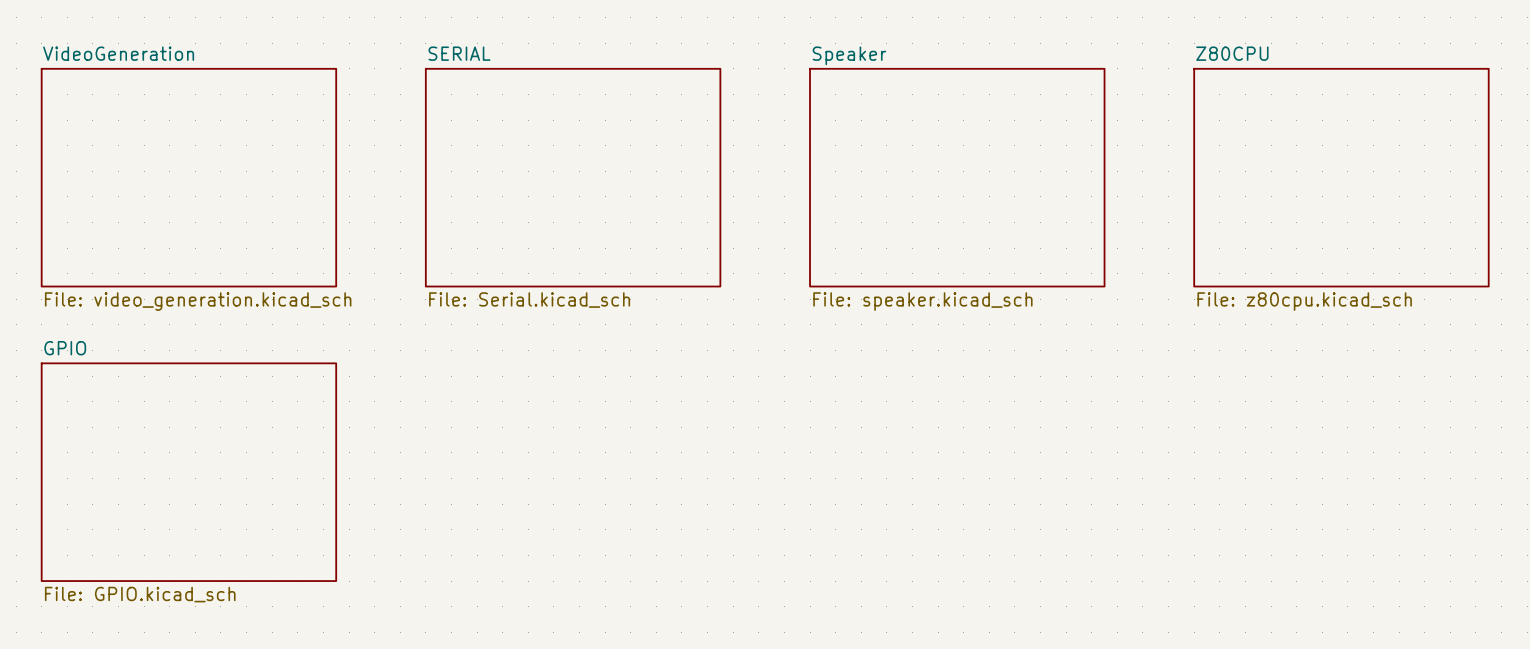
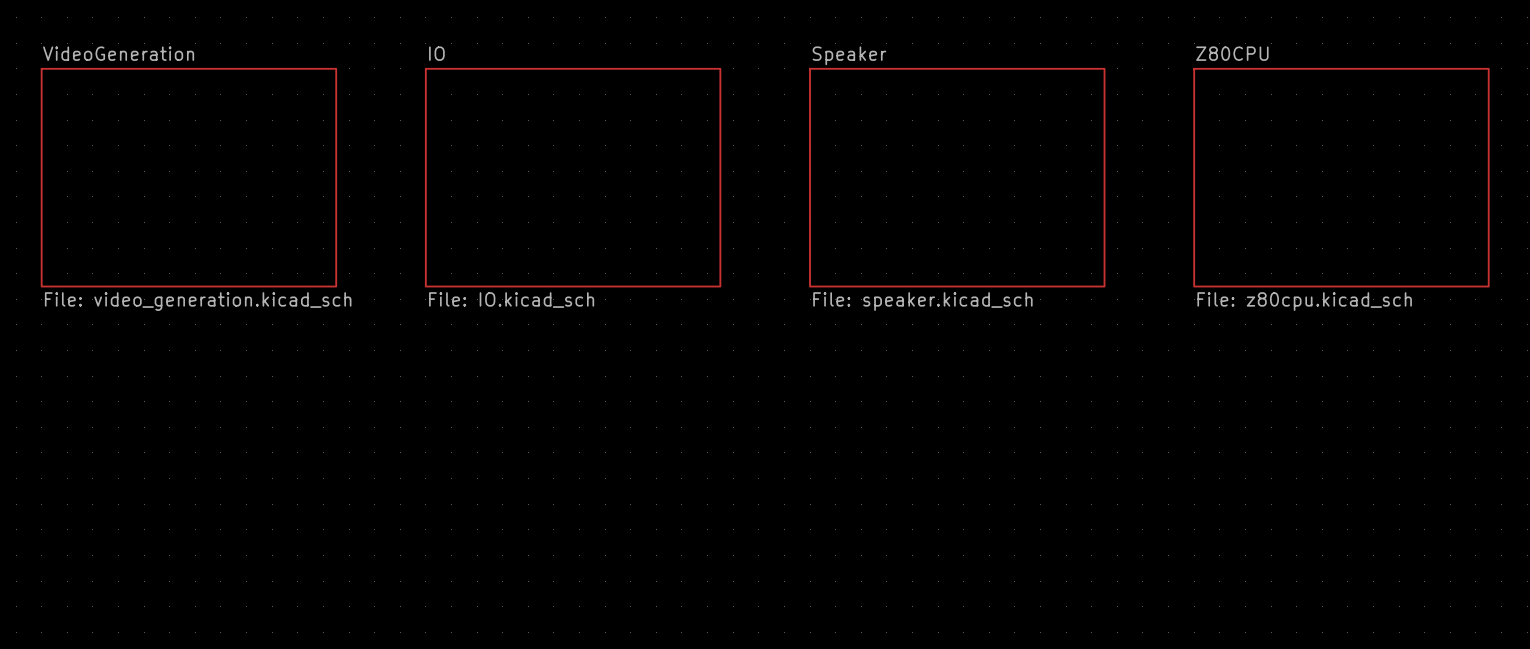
sheet SERIAL name: SERIAL (459, 53) -> IO (436, 53)
sheet SERIAL value: File: Serial.kicad_sch (529, 300) -> File: IO.kicad_sch (511, 300)
sheet GPIO: File: GPIO.kicad_sch (188, 472) -> none

